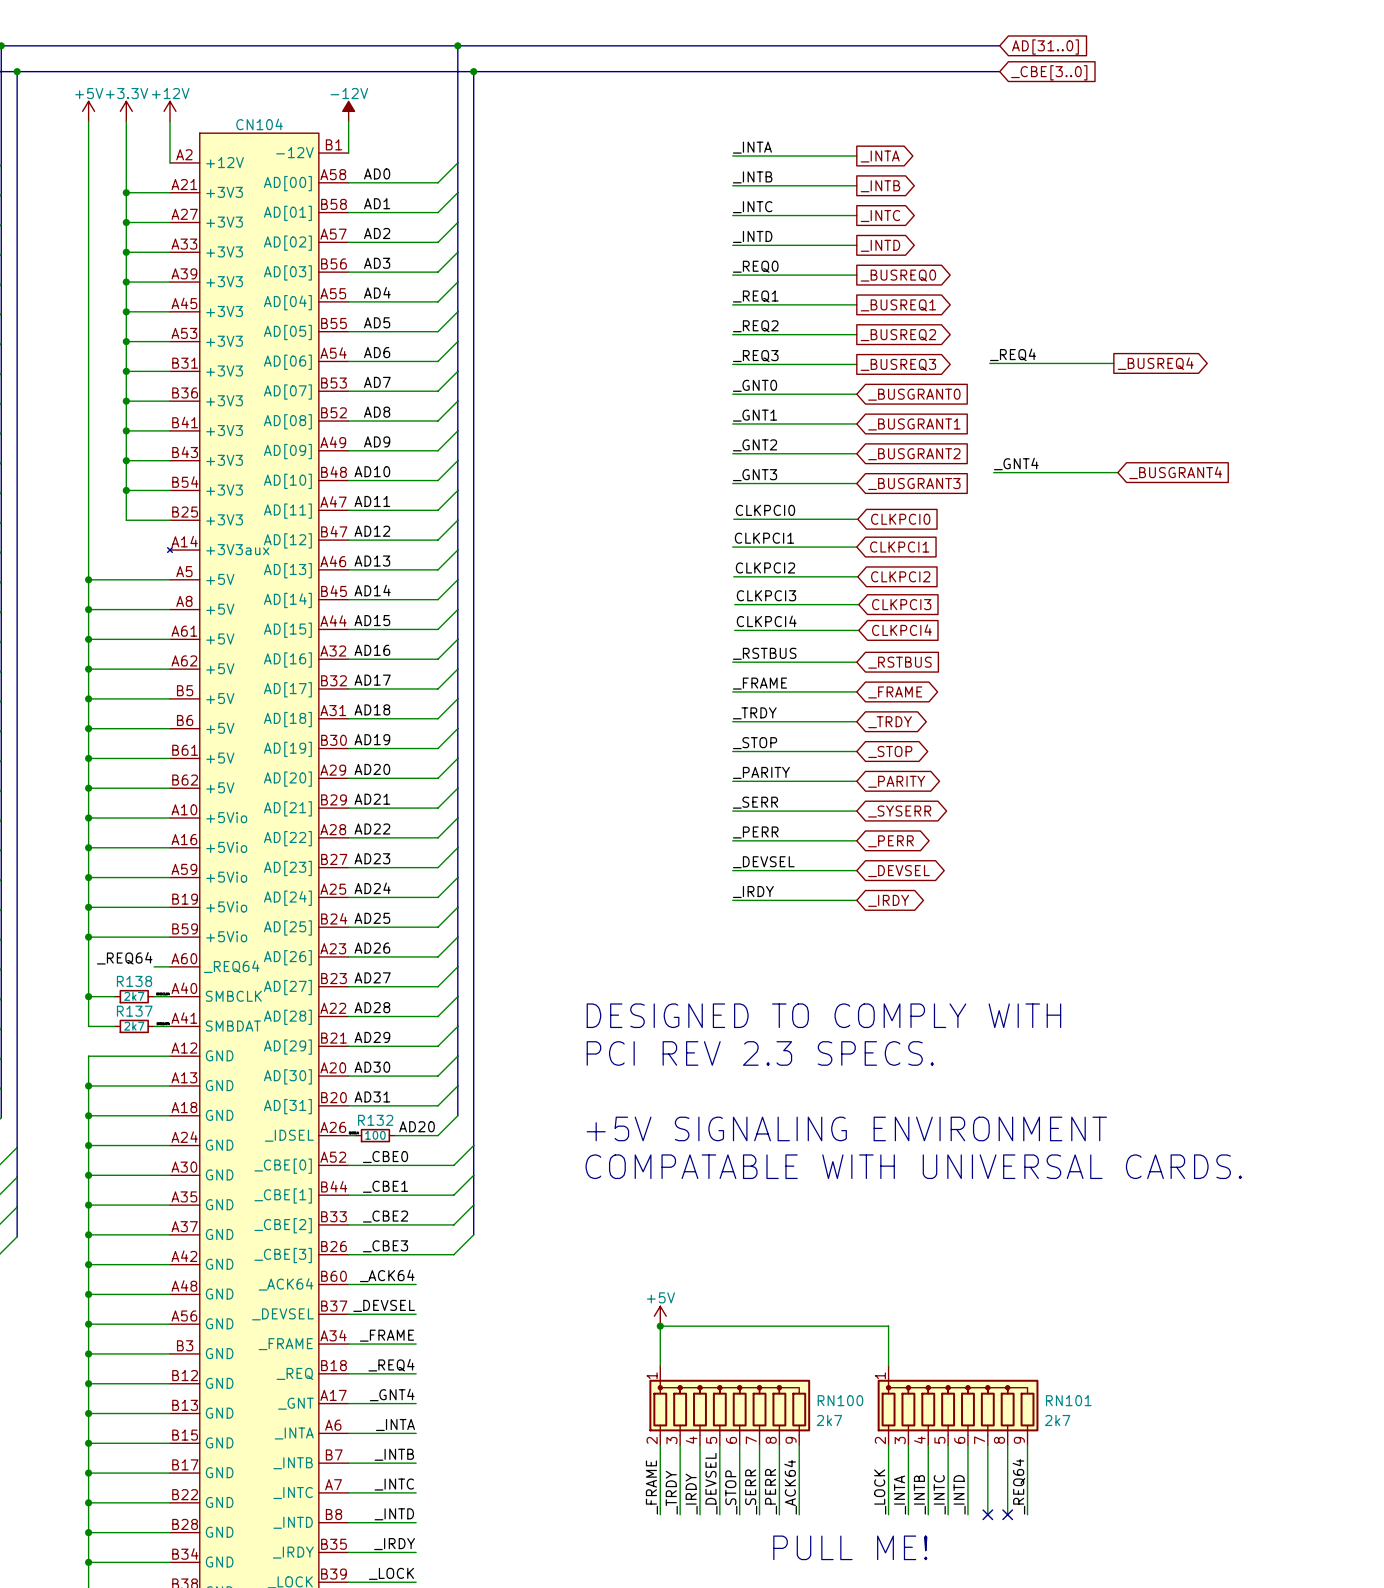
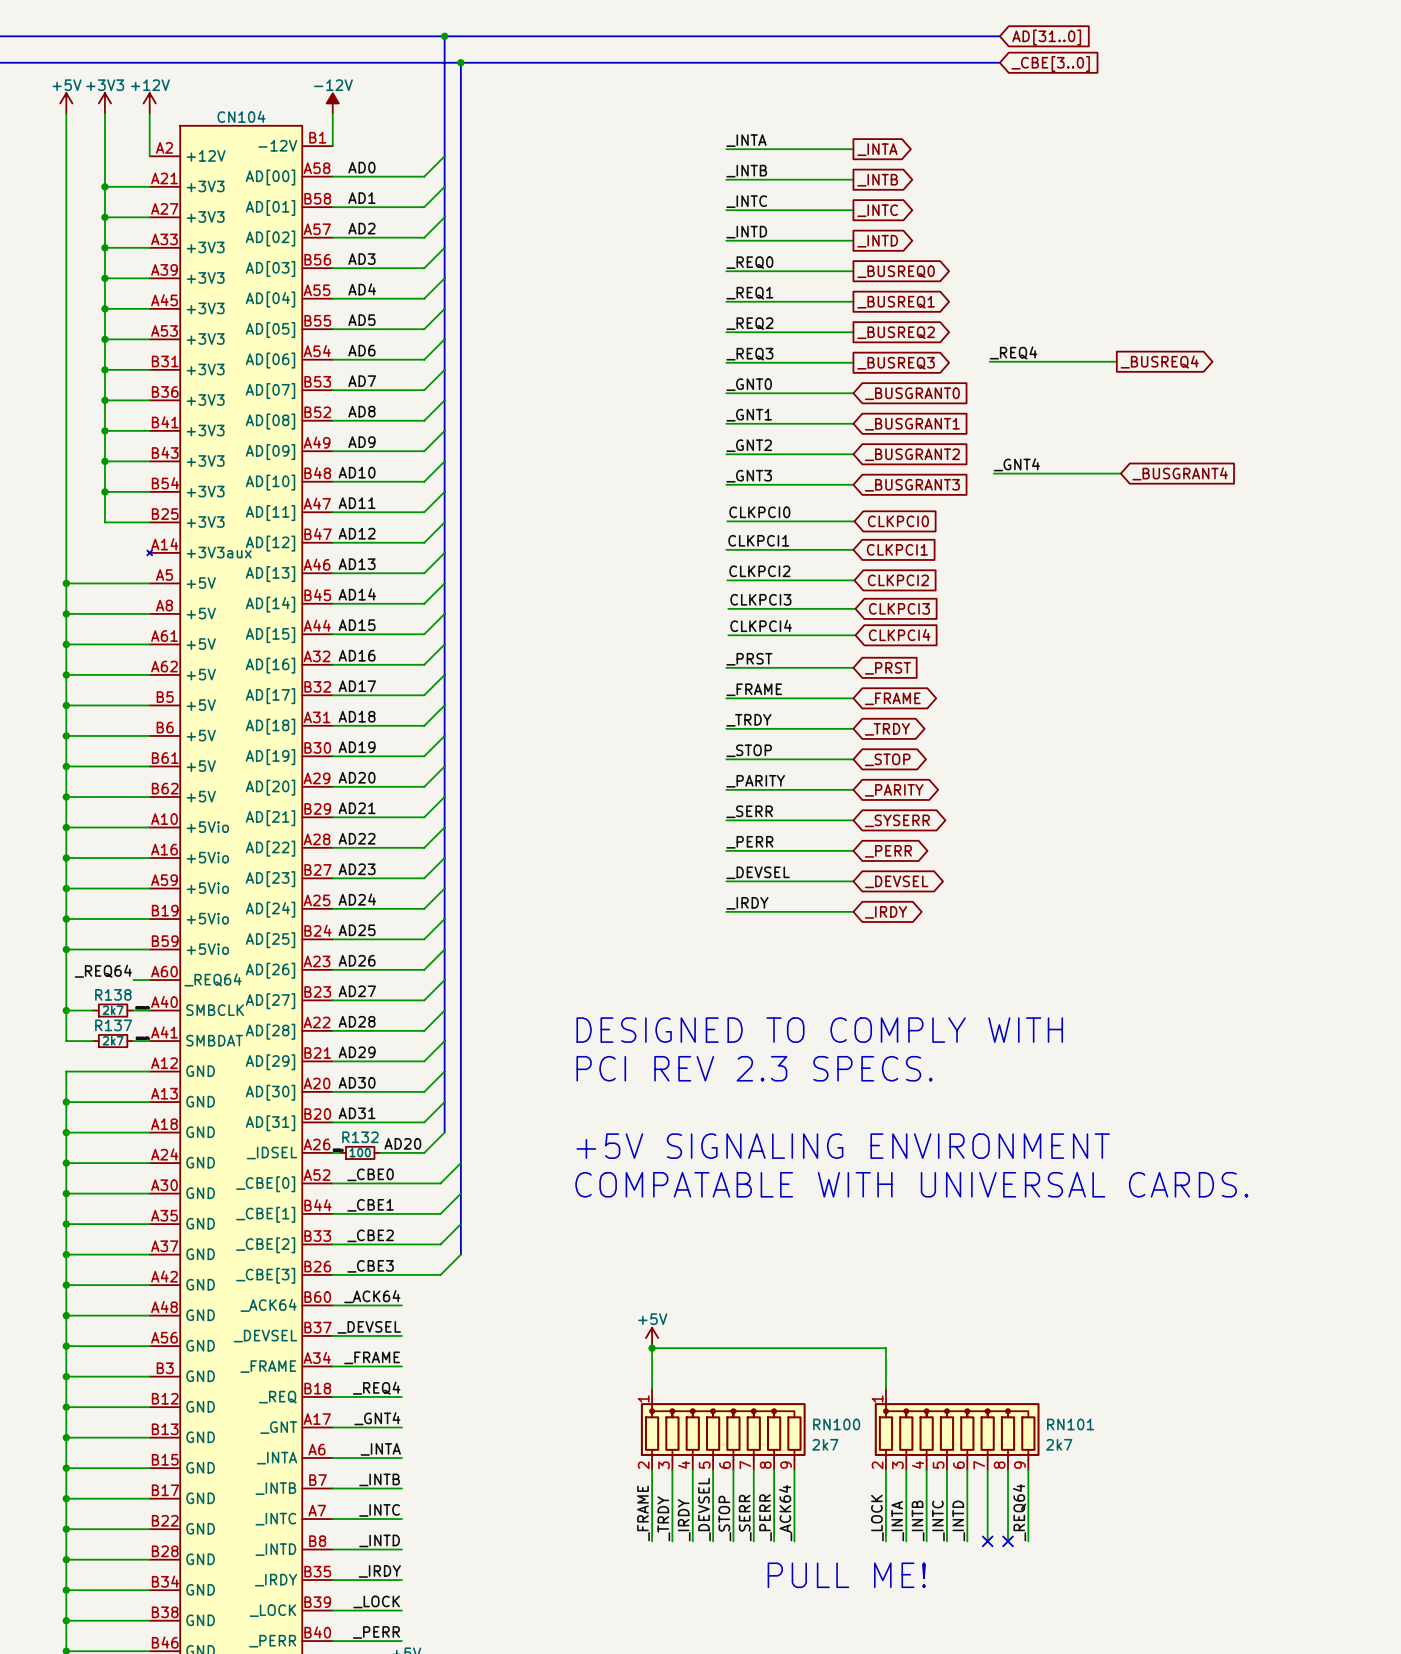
power symbol: +3.3V (126, 111) -> +3V3 (104, 103)
label: _RSTBUS (764, 653) -> _PRST (749, 659)
global label: _RSTBUS (899, 662) -> _PRST (887, 668)

